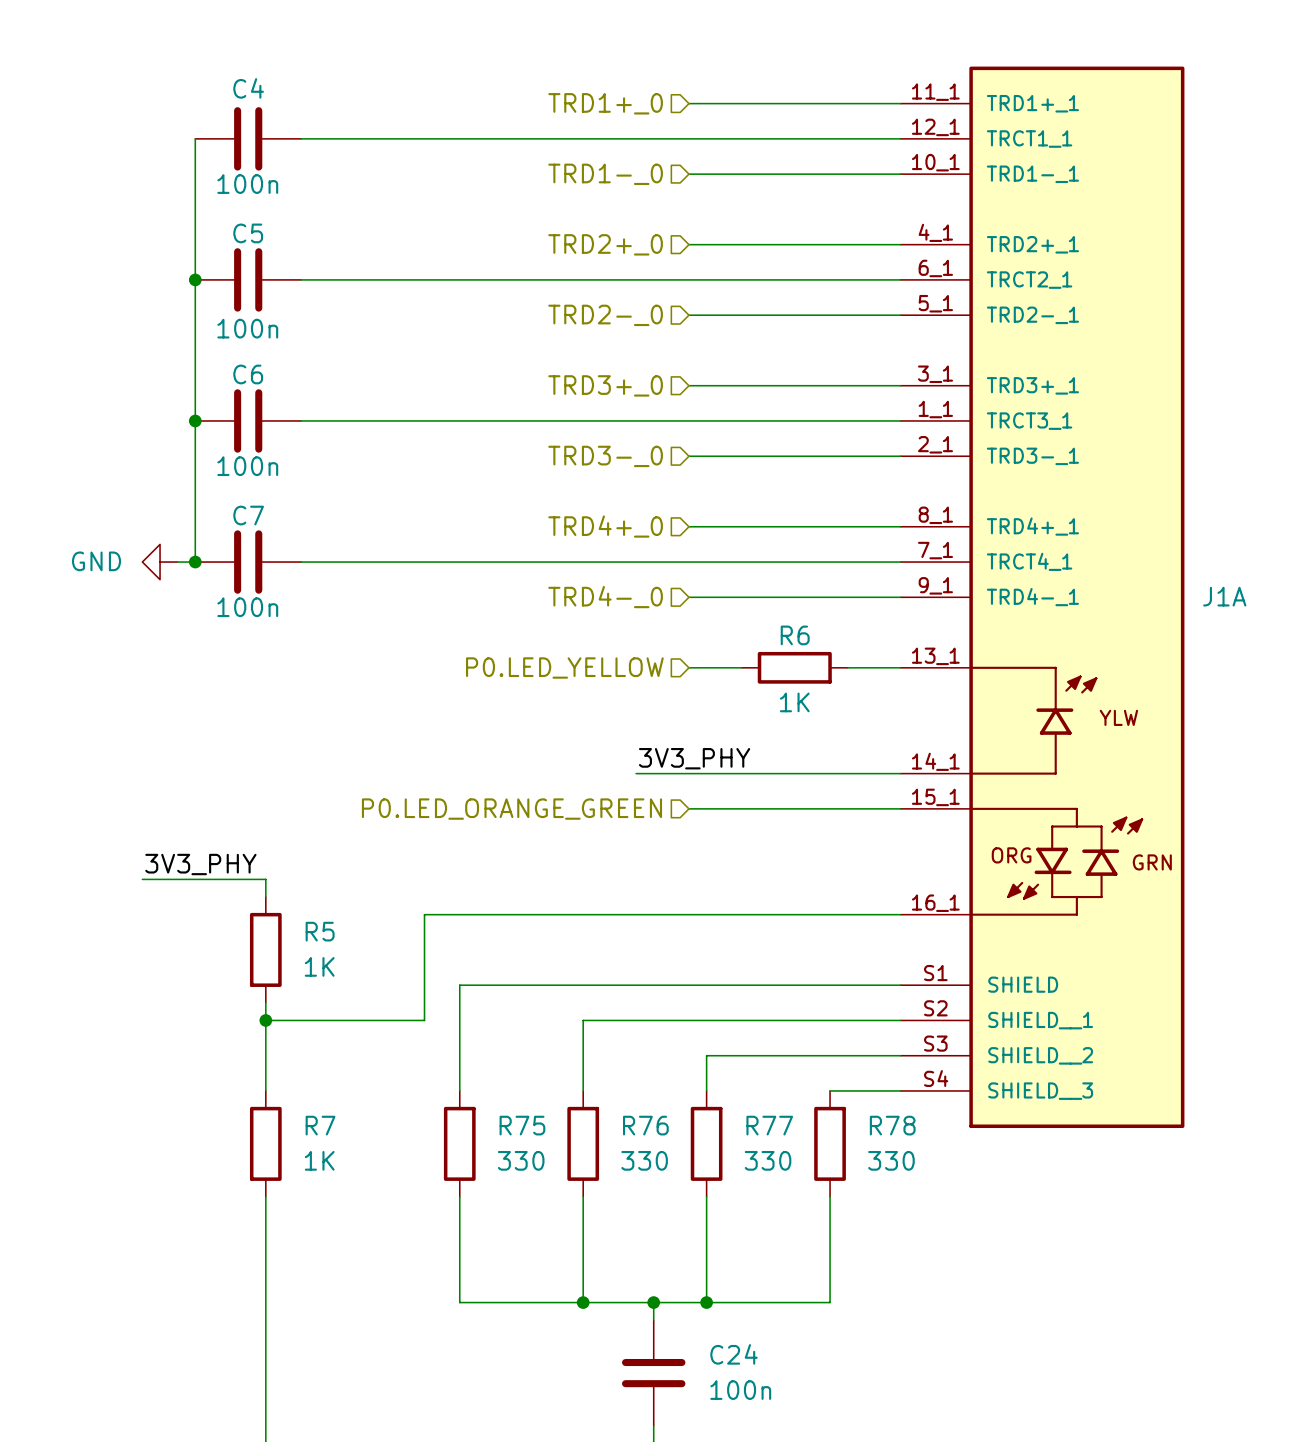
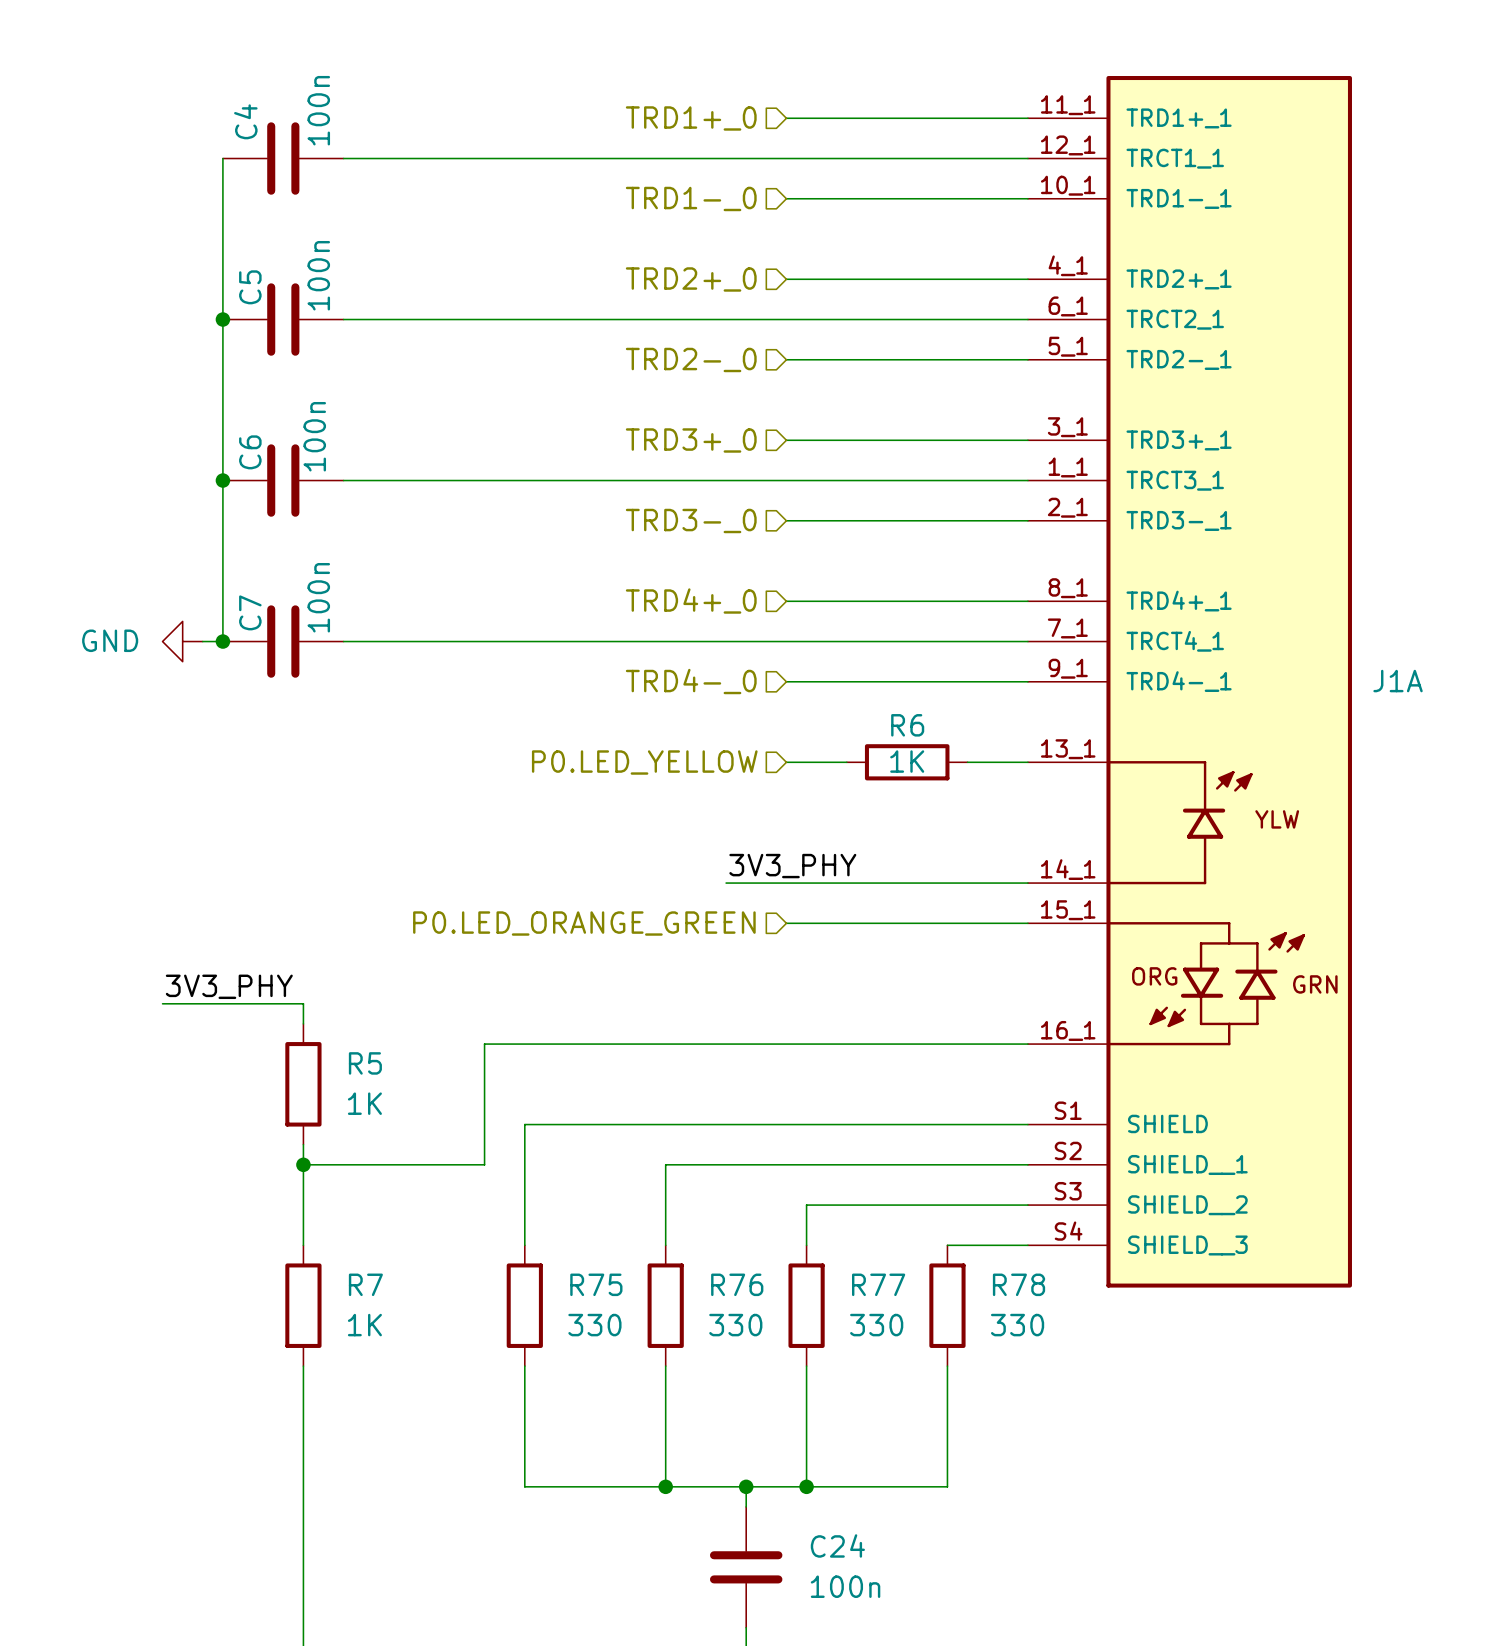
C4 name rotation: 0° (248, 88) -> 90° counterclockwise (245, 121)
C4 value rotation: 0° (247, 184) -> 90° counterclockwise (318, 110)
C4 value position: 100n (247, 184) -> 100n (318, 110)
C5 name rotation: 0° (248, 233) -> 90° counterclockwise (250, 287)
C5 value rotation: 0° (247, 328) -> 90° counterclockwise (318, 275)
C5 value position: 100n (247, 328) -> 100n (318, 275)
C6 name rotation: 0° (248, 374) -> 90° counterclockwise (250, 452)
C6 value rotation: 0° (247, 466) -> 90° counterclockwise (314, 436)
C6 value position: 100n (247, 466) -> 100n (314, 436)
C7 name rotation: 0° (248, 515) -> 90° counterclockwise (250, 612)
C7 value rotation: 0° (247, 607) -> 90° counterclockwise (318, 597)
C7 value position: 100n (247, 607) -> 100n (318, 597)
R6 value position: 1K (794, 702) -> 1K (907, 761)

